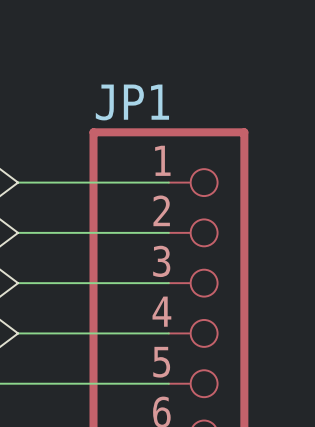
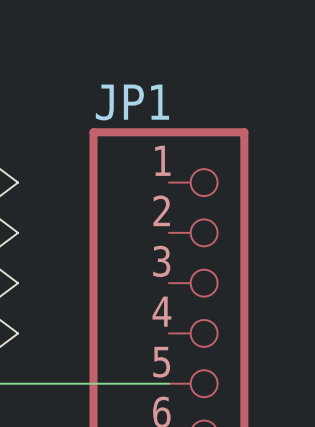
wire: (18, 182) (168, 182) -> none
wire: (18, 232) (168, 232) -> none
wire: (18, 283) (168, 283) -> none
wire: (18, 333) (168, 333) -> none

